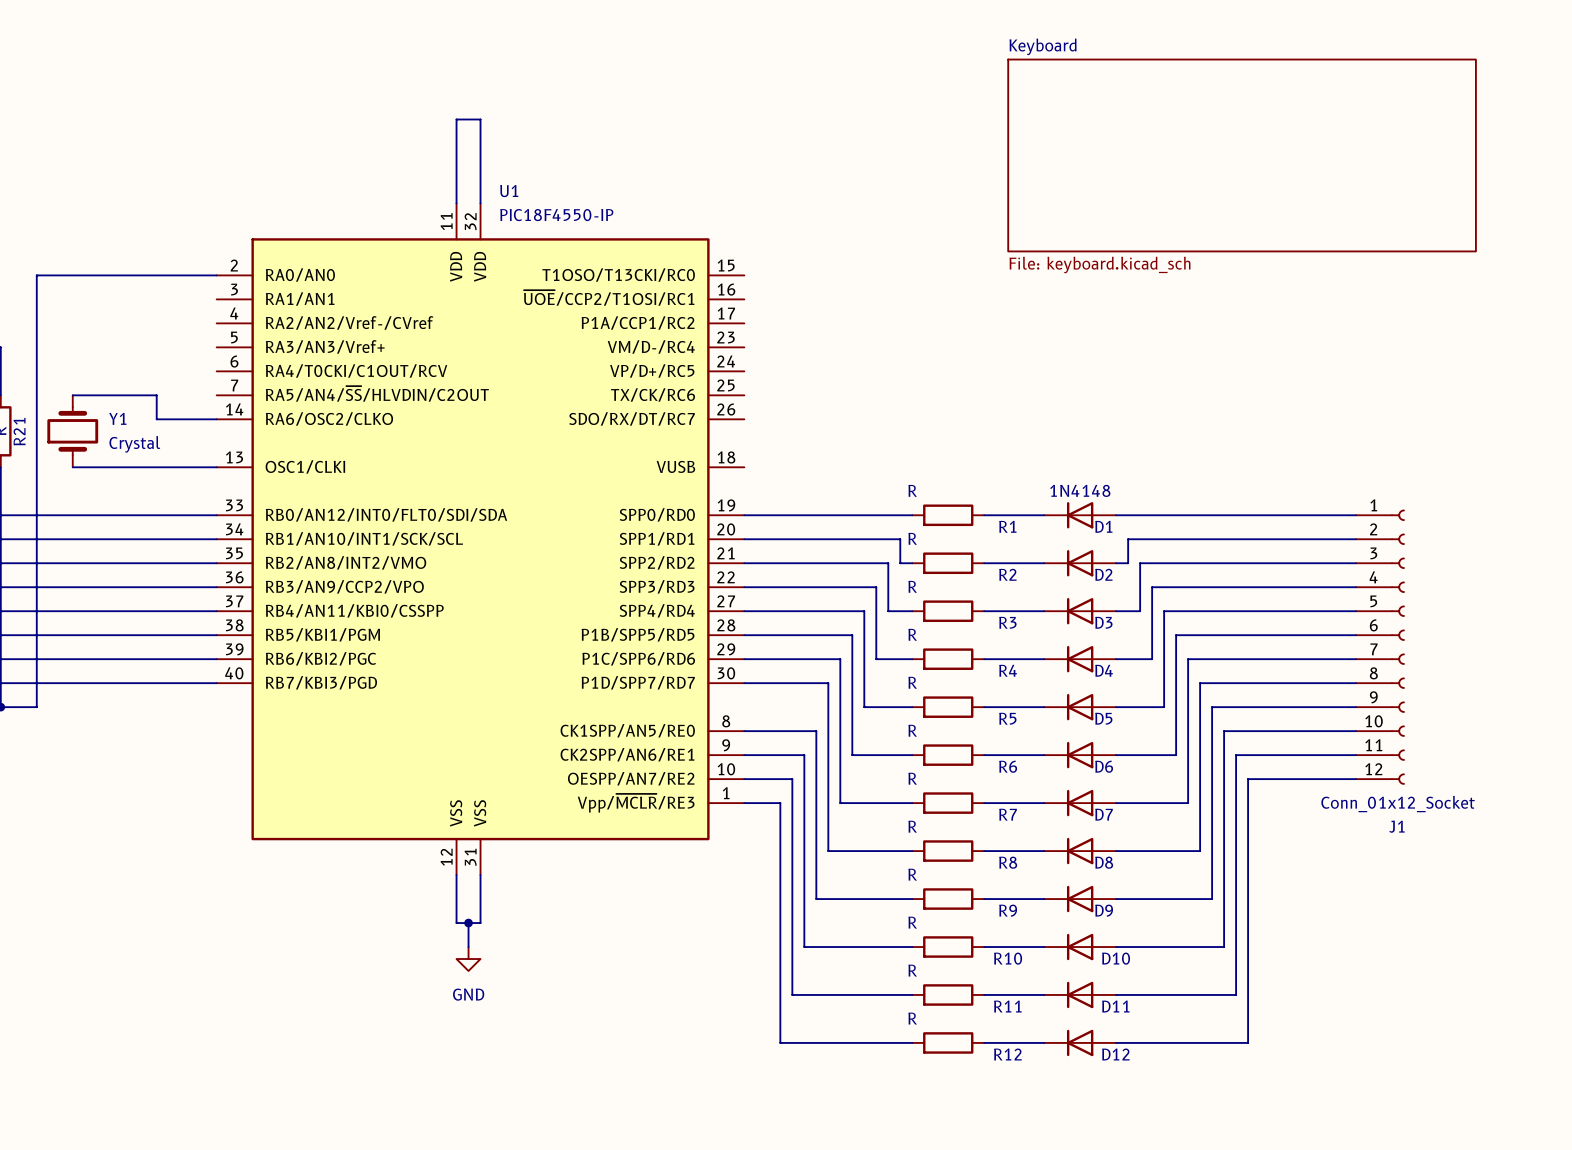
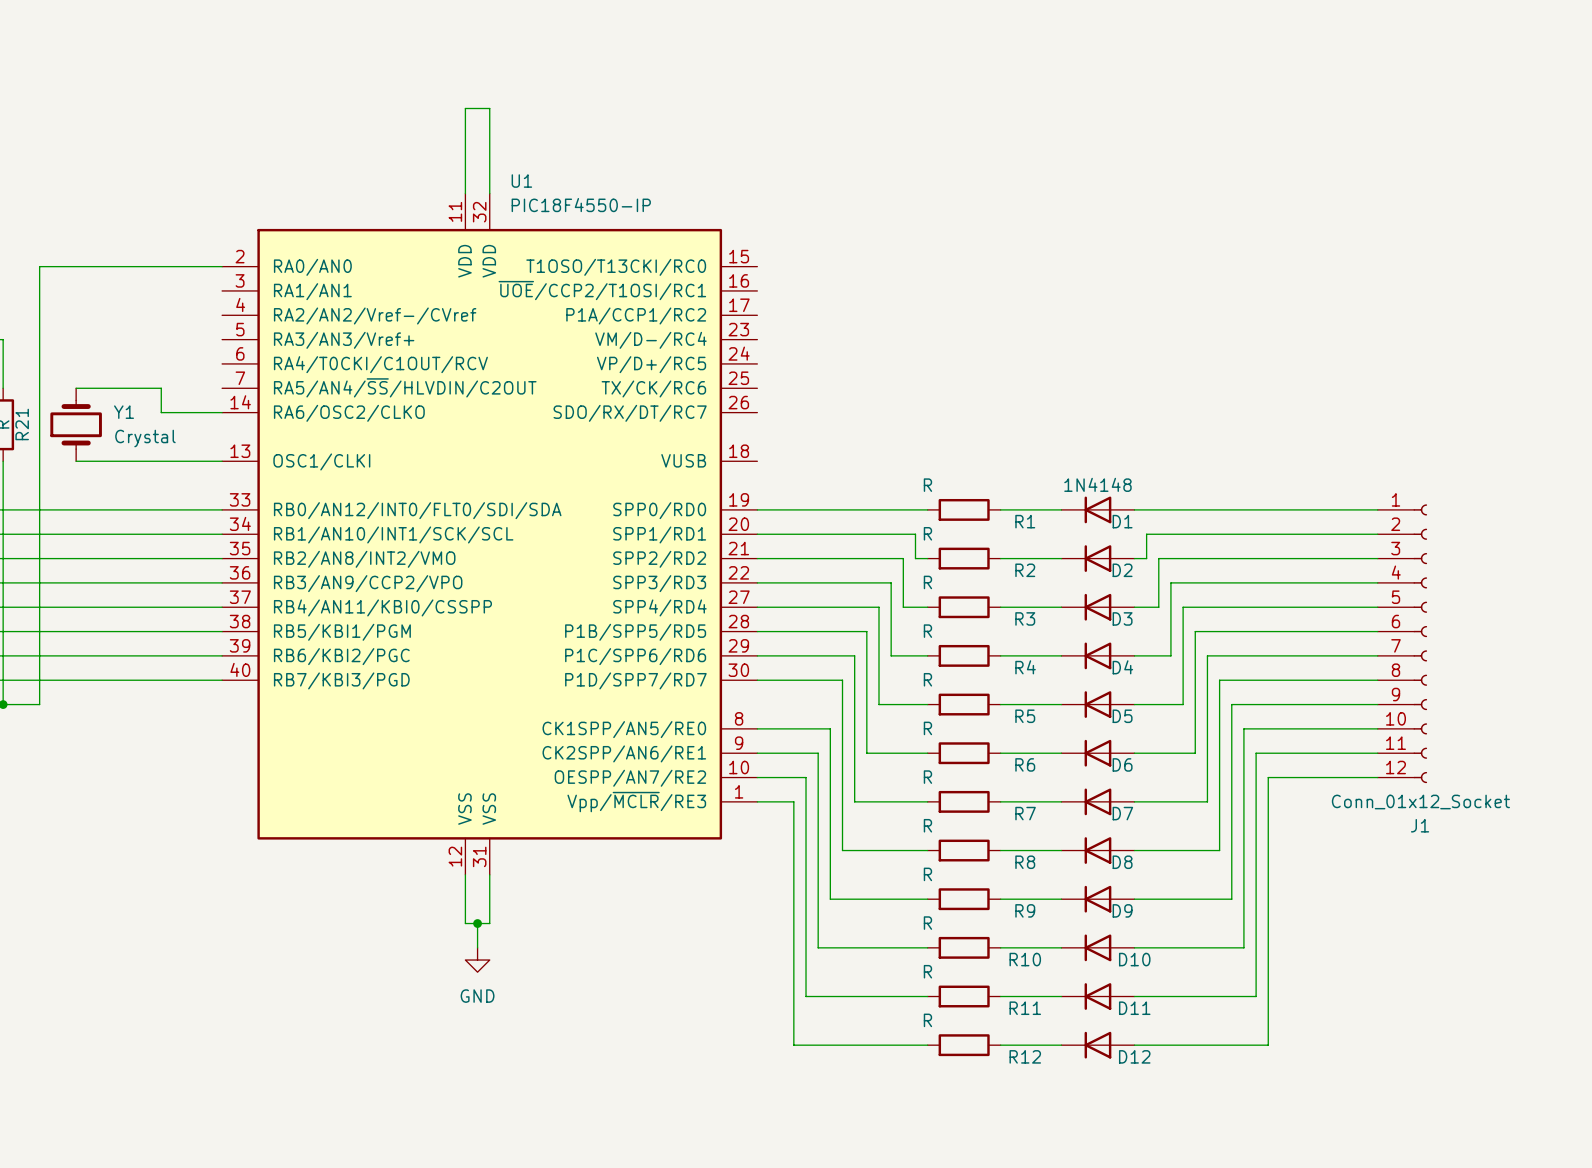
sheet Keyboard: File: keyboard.kicad_sch (1242, 155) -> none

